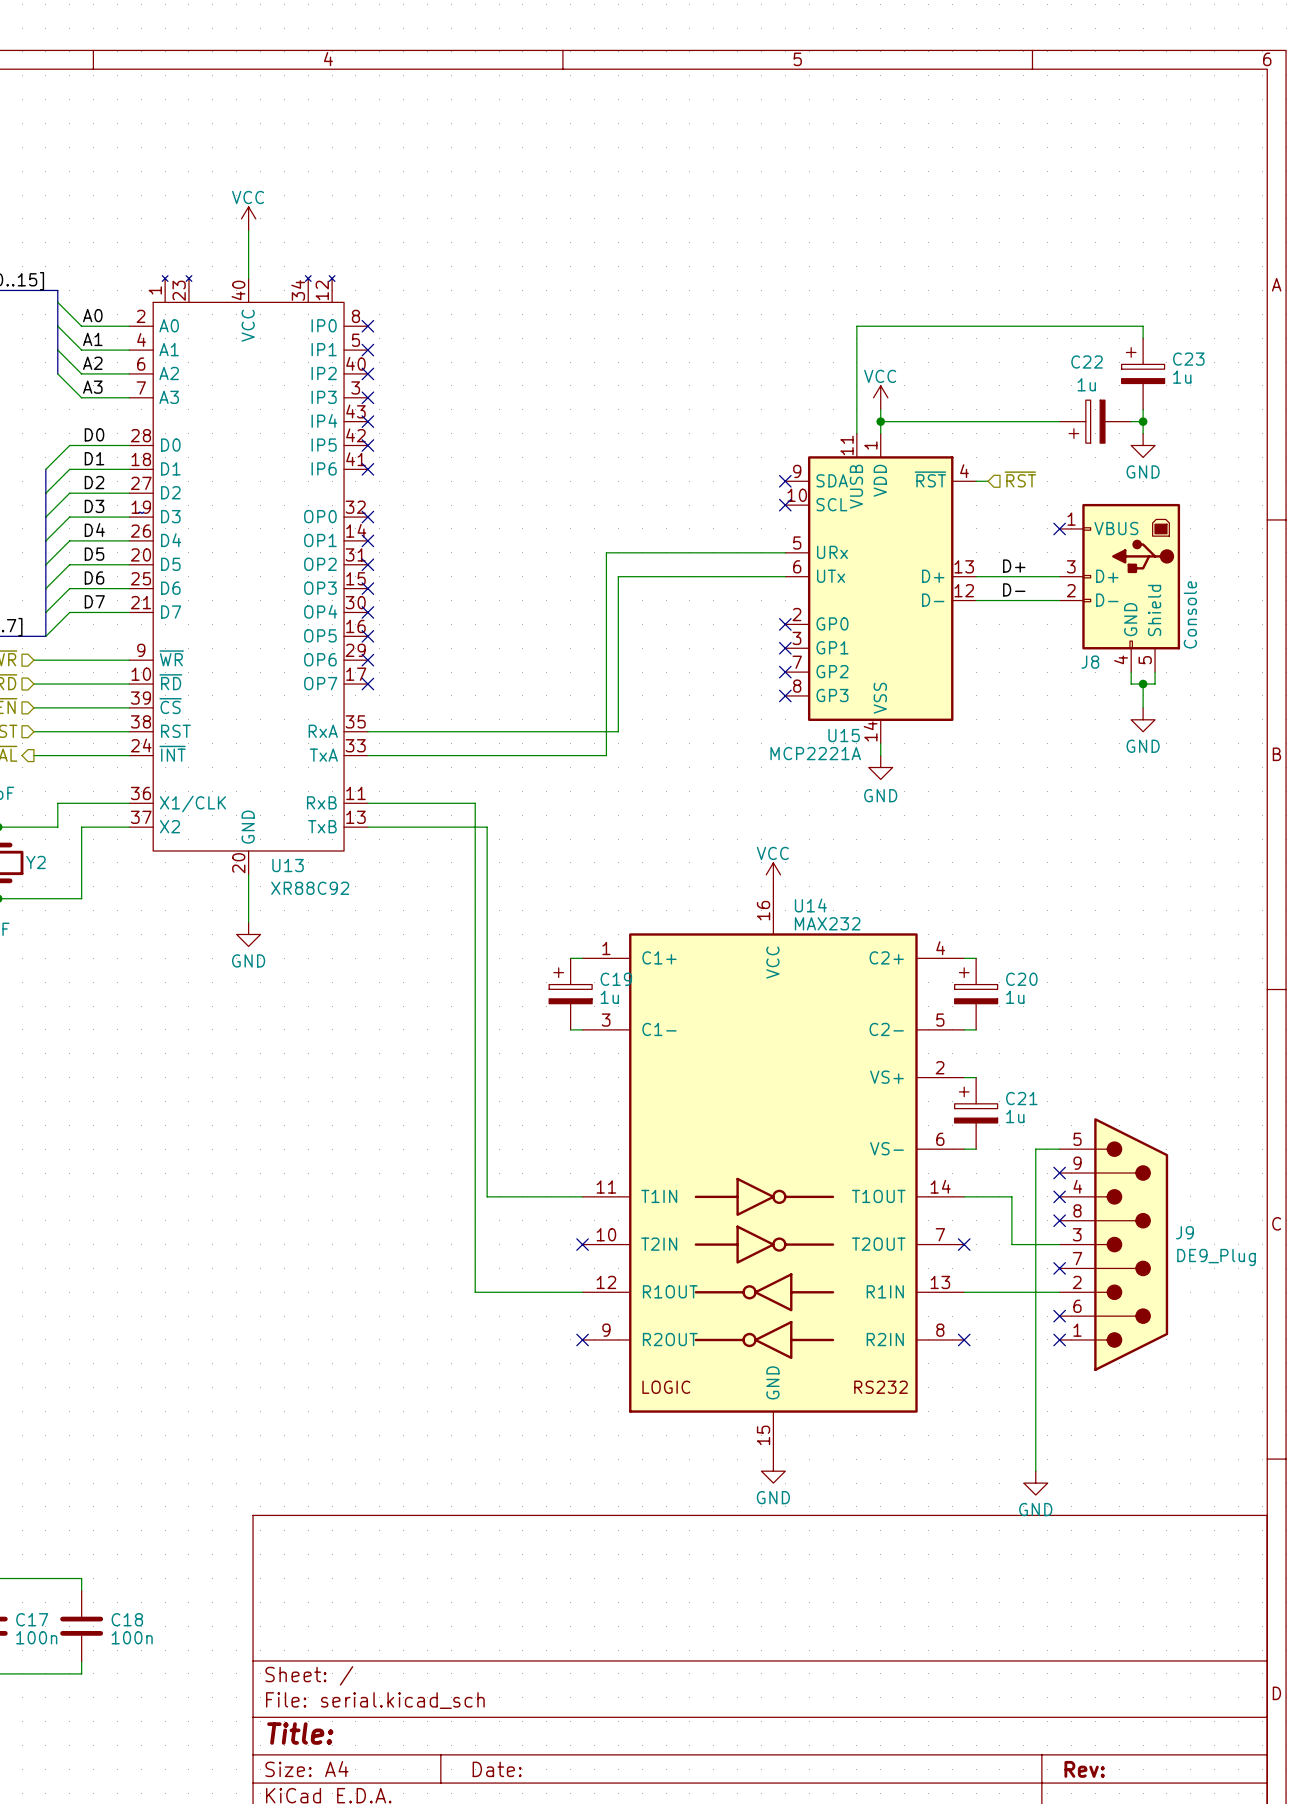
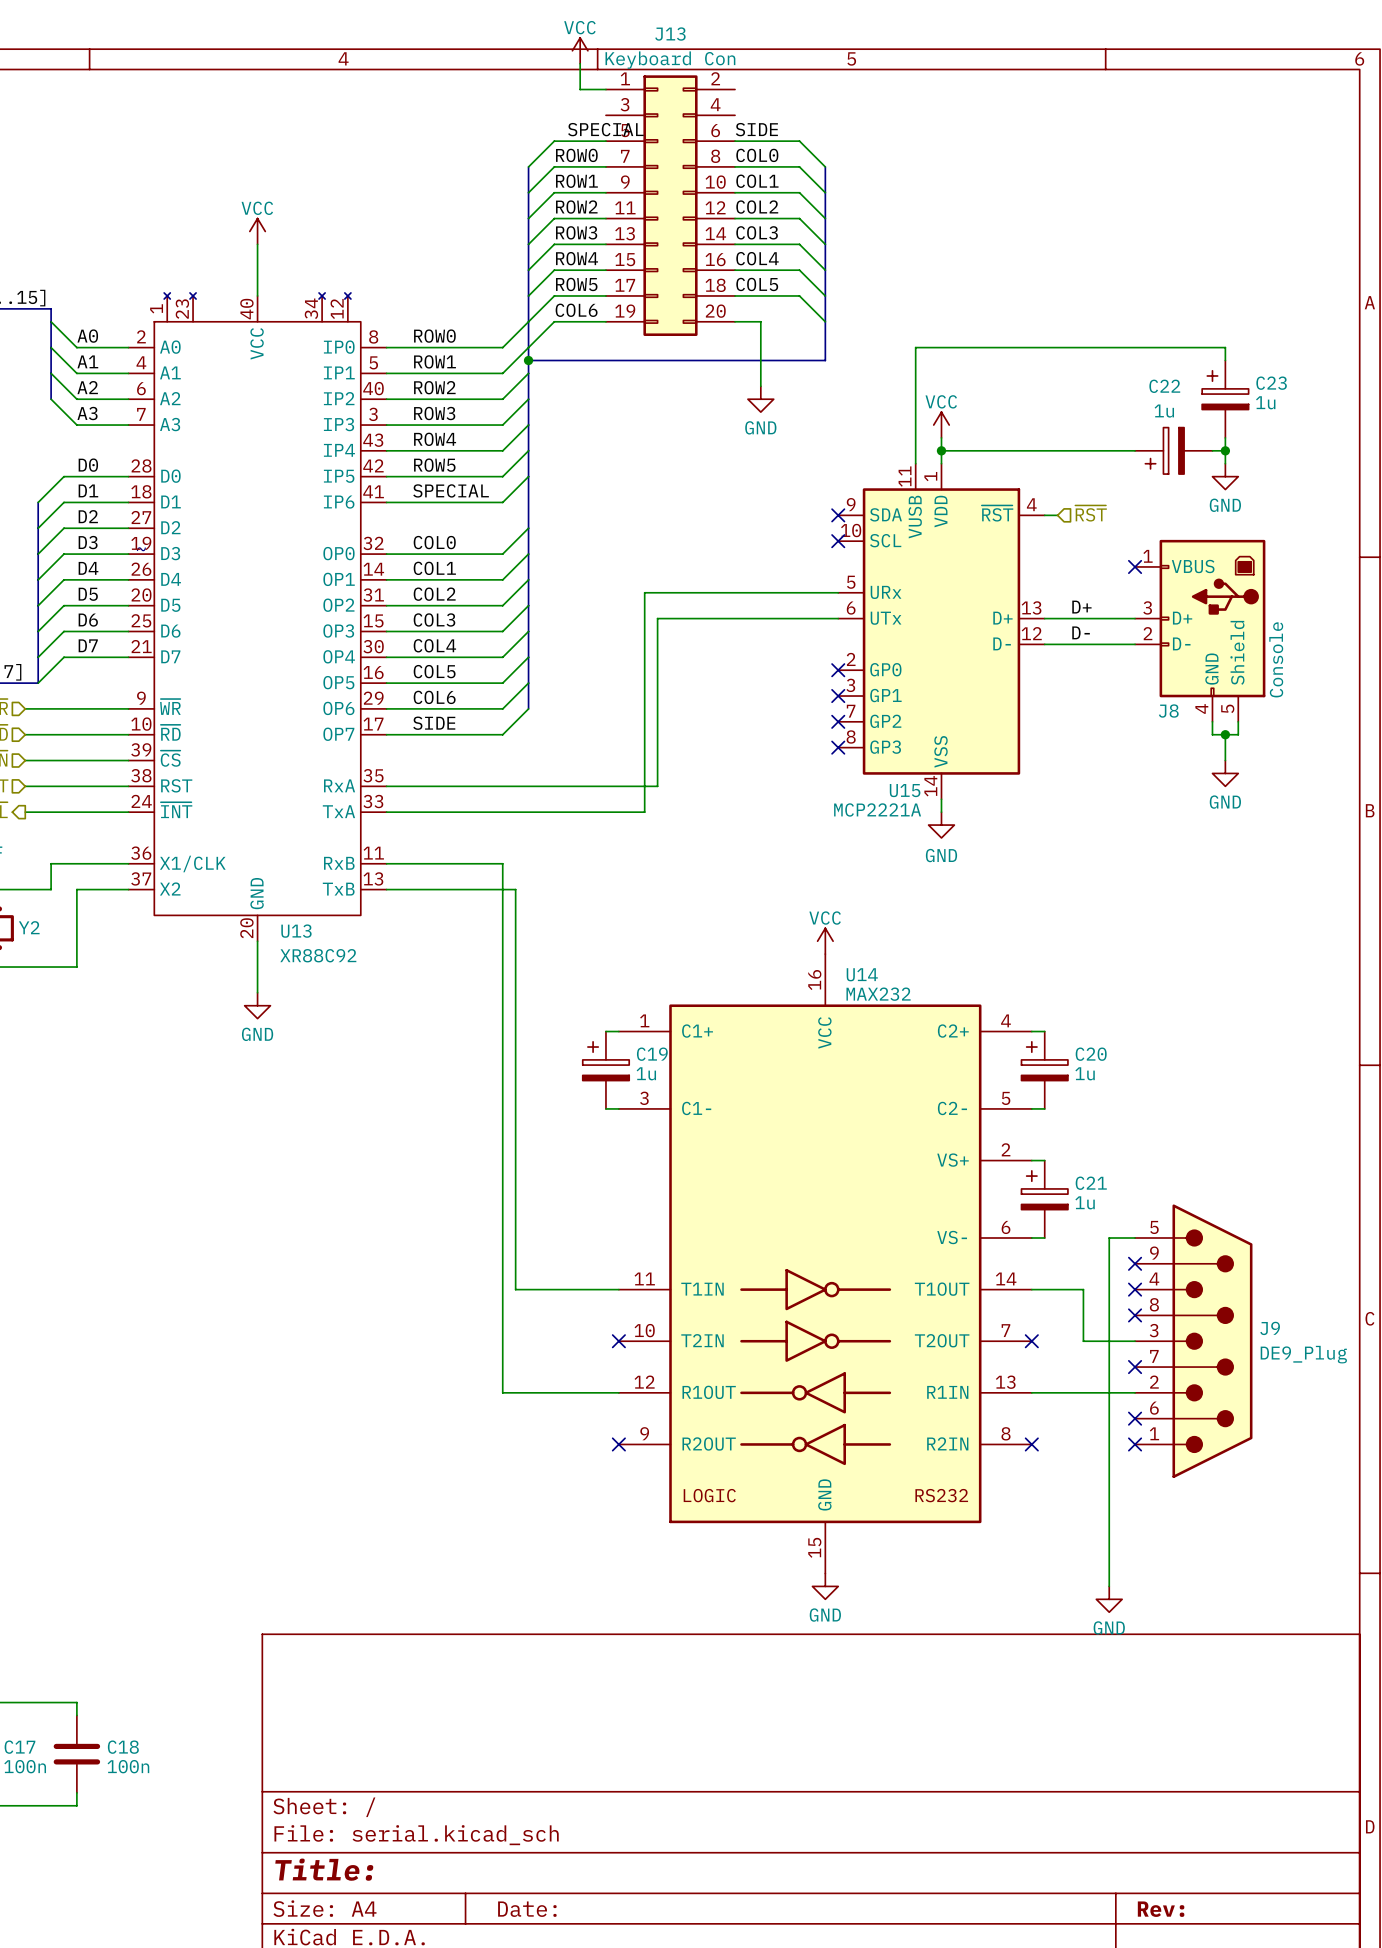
power symbol: none -> VCC (580, 50)
wire: none -> (580, 63) (580, 89) (605, 89)
label: none -> SPECIAL (605, 129)
label: none -> SIDE (756, 129)
wire: none -> (605, 141) (554, 141) (528, 166)
wire: none -> (735, 141) (799, 141) (825, 166)
label: none -> ROW0 (576, 155)
label: none -> COL0 (757, 155)
bus: none -> (528, 166) (528, 708)
wire: none -> (605, 166) (554, 166) (528, 192)
wire: none -> (735, 166) (799, 166) (825, 192)
bus: none -> (825, 166) (825, 360) (528, 360)
label: none -> ROW1 (576, 181)
label: none -> COL1 (757, 181)
wire: none -> (605, 192) (554, 192) (528, 218)
wire: none -> (735, 192) (799, 192) (825, 218)
J13: none -> Keyboard Con (670, 205)
label: none -> ROW2 (576, 207)
label: none -> COL2 (757, 207)
wire: none -> (605, 218) (554, 218) (528, 244)
wire: none -> (735, 218) (799, 218) (825, 244)
label: none -> ROW3 (576, 232)
label: none -> COL3 (757, 232)
wire: none -> (605, 244) (554, 244) (528, 270)
wire: none -> (735, 244) (799, 244) (825, 270)
label: none -> ROW4 (577, 258)
label: none -> COL4 (757, 258)
wire: none -> (605, 270) (554, 270) (528, 295)
wire: none -> (735, 270) (799, 270) (825, 295)
label: none -> ROW5 (576, 284)
label: none -> COL5 (757, 284)
wire: none -> (605, 295) (554, 295) (502, 347) (386, 347)
wire: none -> (735, 295) (799, 295) (825, 321)
label: none -> COL6 (576, 310)
wire: none -> (605, 321) (554, 321) (502, 373) (386, 373)
wire: none -> (735, 321) (760, 321) (760, 386)
label: none -> ROW0 (434, 336)
no-connect mark: (367, 326) -> none
junction: none -> (528, 360)
label: none -> ROW1 (434, 361)
no-connect mark: (367, 350) -> none
wire: none -> (528, 373) (502, 399) (386, 399)
label: none -> ROW2 (434, 387)
no-connect mark: (367, 373) -> none
wire: none -> (528, 399) (502, 425) (386, 425)
power symbol: none -> GND (760, 399)
label: none -> ROW3 (434, 413)
no-connect mark: (367, 397) -> none
wire: none -> (528, 425) (502, 450) (386, 450)
label: none -> ROW4 (435, 439)
no-connect mark: (367, 421) -> none
wire: none -> (528, 450) (502, 476) (386, 476)
label: none -> ROW5 (434, 465)
no-connect mark: (367, 445) -> none
wire: none -> (528, 476) (502, 502) (386, 502)
label: none -> SPECIAL (451, 490)
no-connect mark: (367, 469) -> none
wire: none -> (528, 528) (502, 554) (386, 554)
label: none -> COL0 (434, 542)
no-connect mark: (367, 517) -> none
wire: none -> (528, 554) (502, 579) (386, 579)
label: none -> COL1 (434, 568)
no-connect mark: (367, 540) -> none
wire: none -> (528, 579) (502, 605) (386, 605)
label: none -> COL2 (434, 594)
no-connect mark: (367, 564) -> none
wire: none -> (528, 605) (502, 631) (386, 631)
label: none -> COL3 (434, 619)
no-connect mark: (367, 588) -> none
wire: none -> (528, 631) (502, 657) (386, 657)
label: none -> COL4 (434, 645)
no-connect mark: (367, 612) -> none
wire: none -> (528, 657) (502, 683) (386, 683)
label: none -> COL5 (434, 671)
no-connect mark: (367, 636) -> none
wire: none -> (528, 683) (502, 708) (386, 708)
label: none -> COL6 (434, 697)
no-connect mark: (367, 660) -> none
wire: none -> (528, 708) (502, 734) (386, 734)
label: none -> SIDE (434, 723)
no-connect mark: (367, 684) -> none

